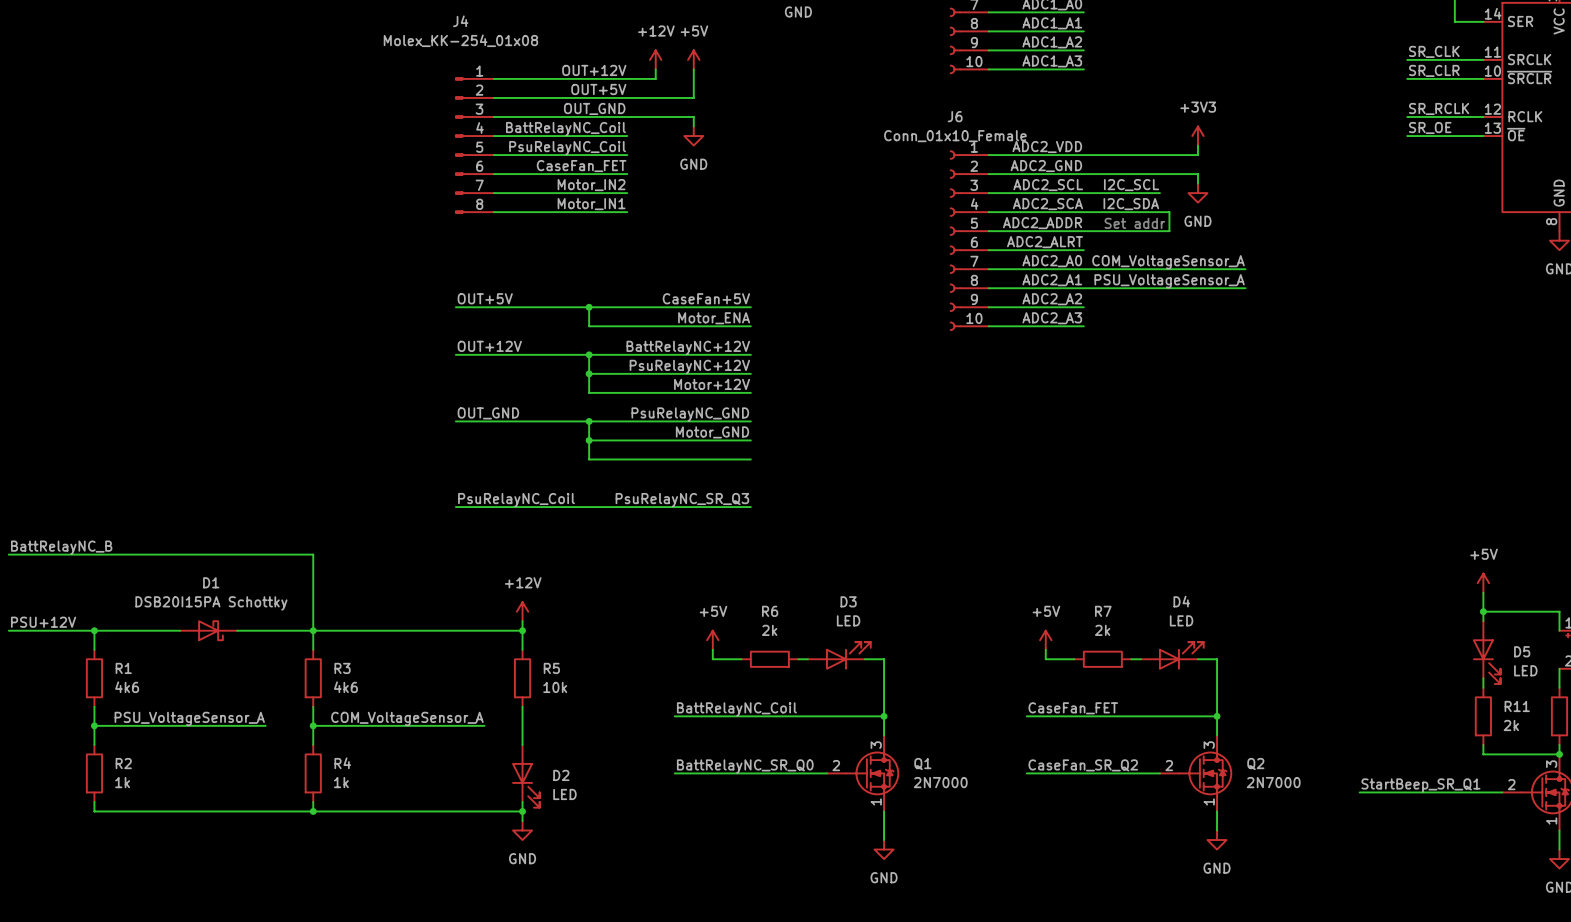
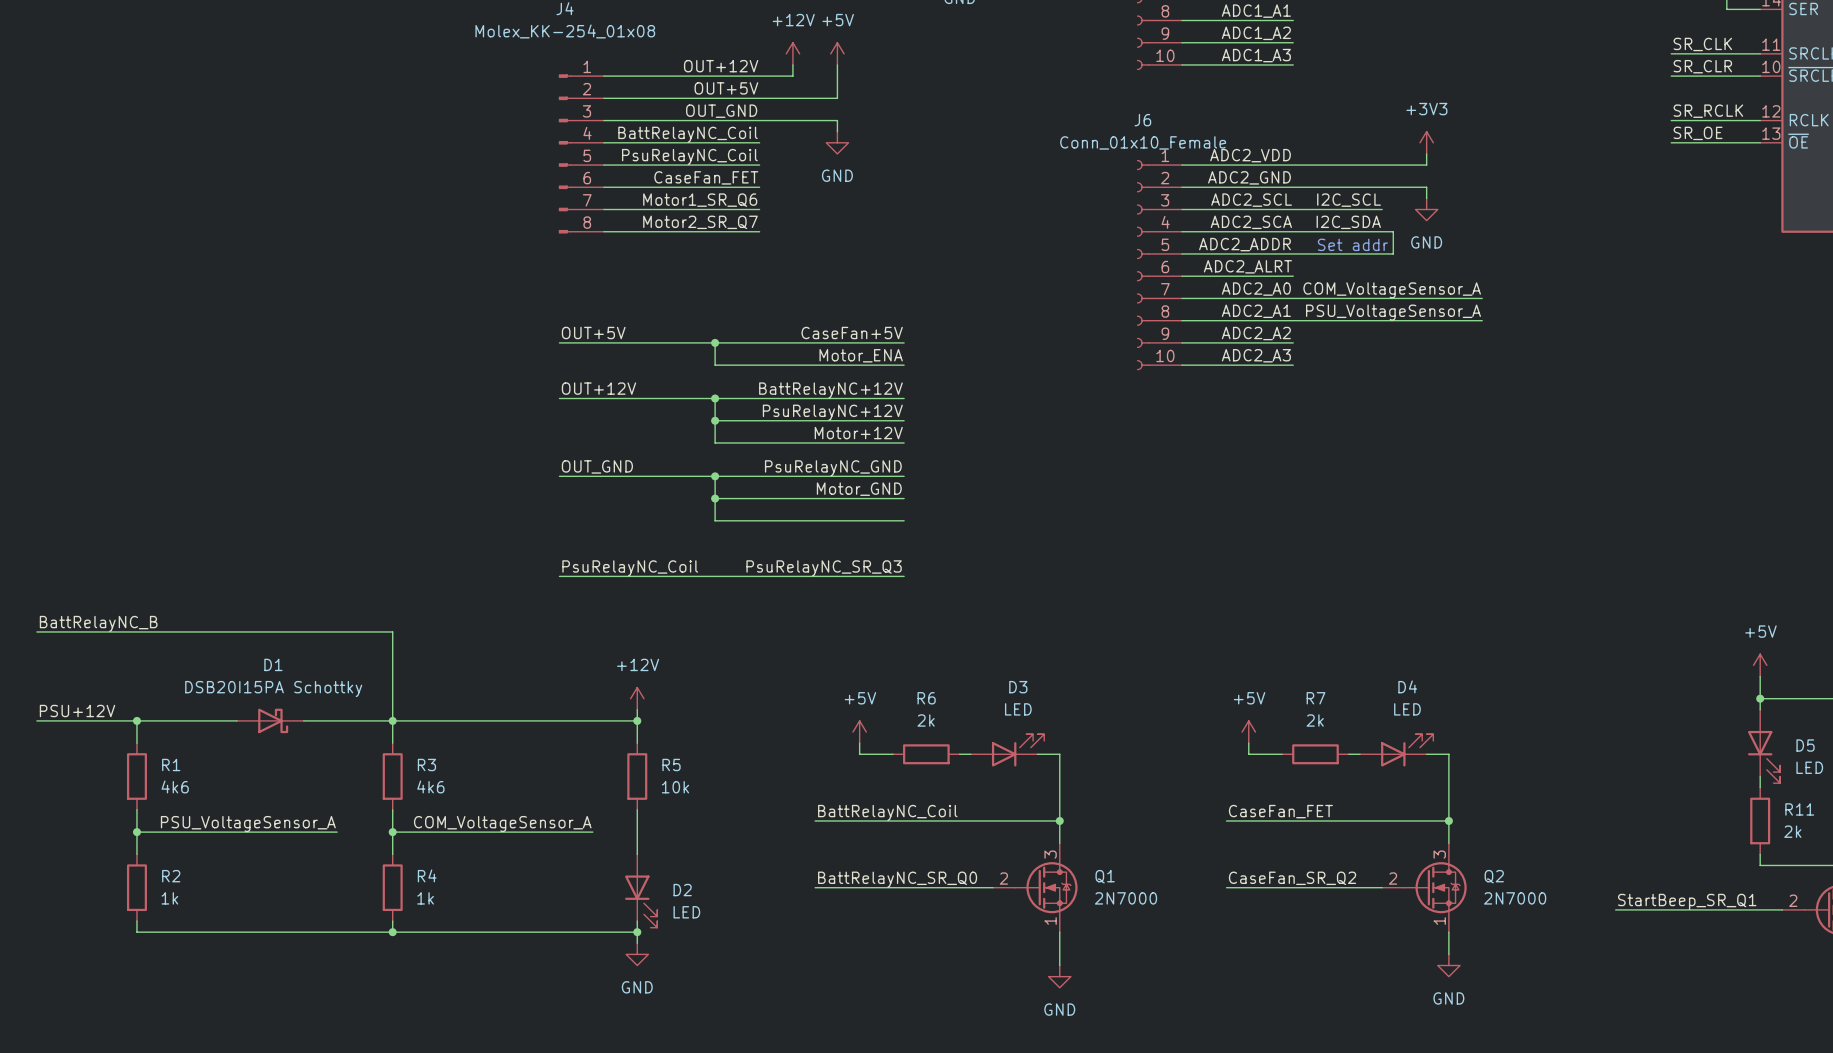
label: Motor_IN2 (591, 185) -> Motor1_SR_Q6 (700, 200)
label: Motor_IN1 (591, 204) -> Motor2_SR_Q7 (700, 222)

